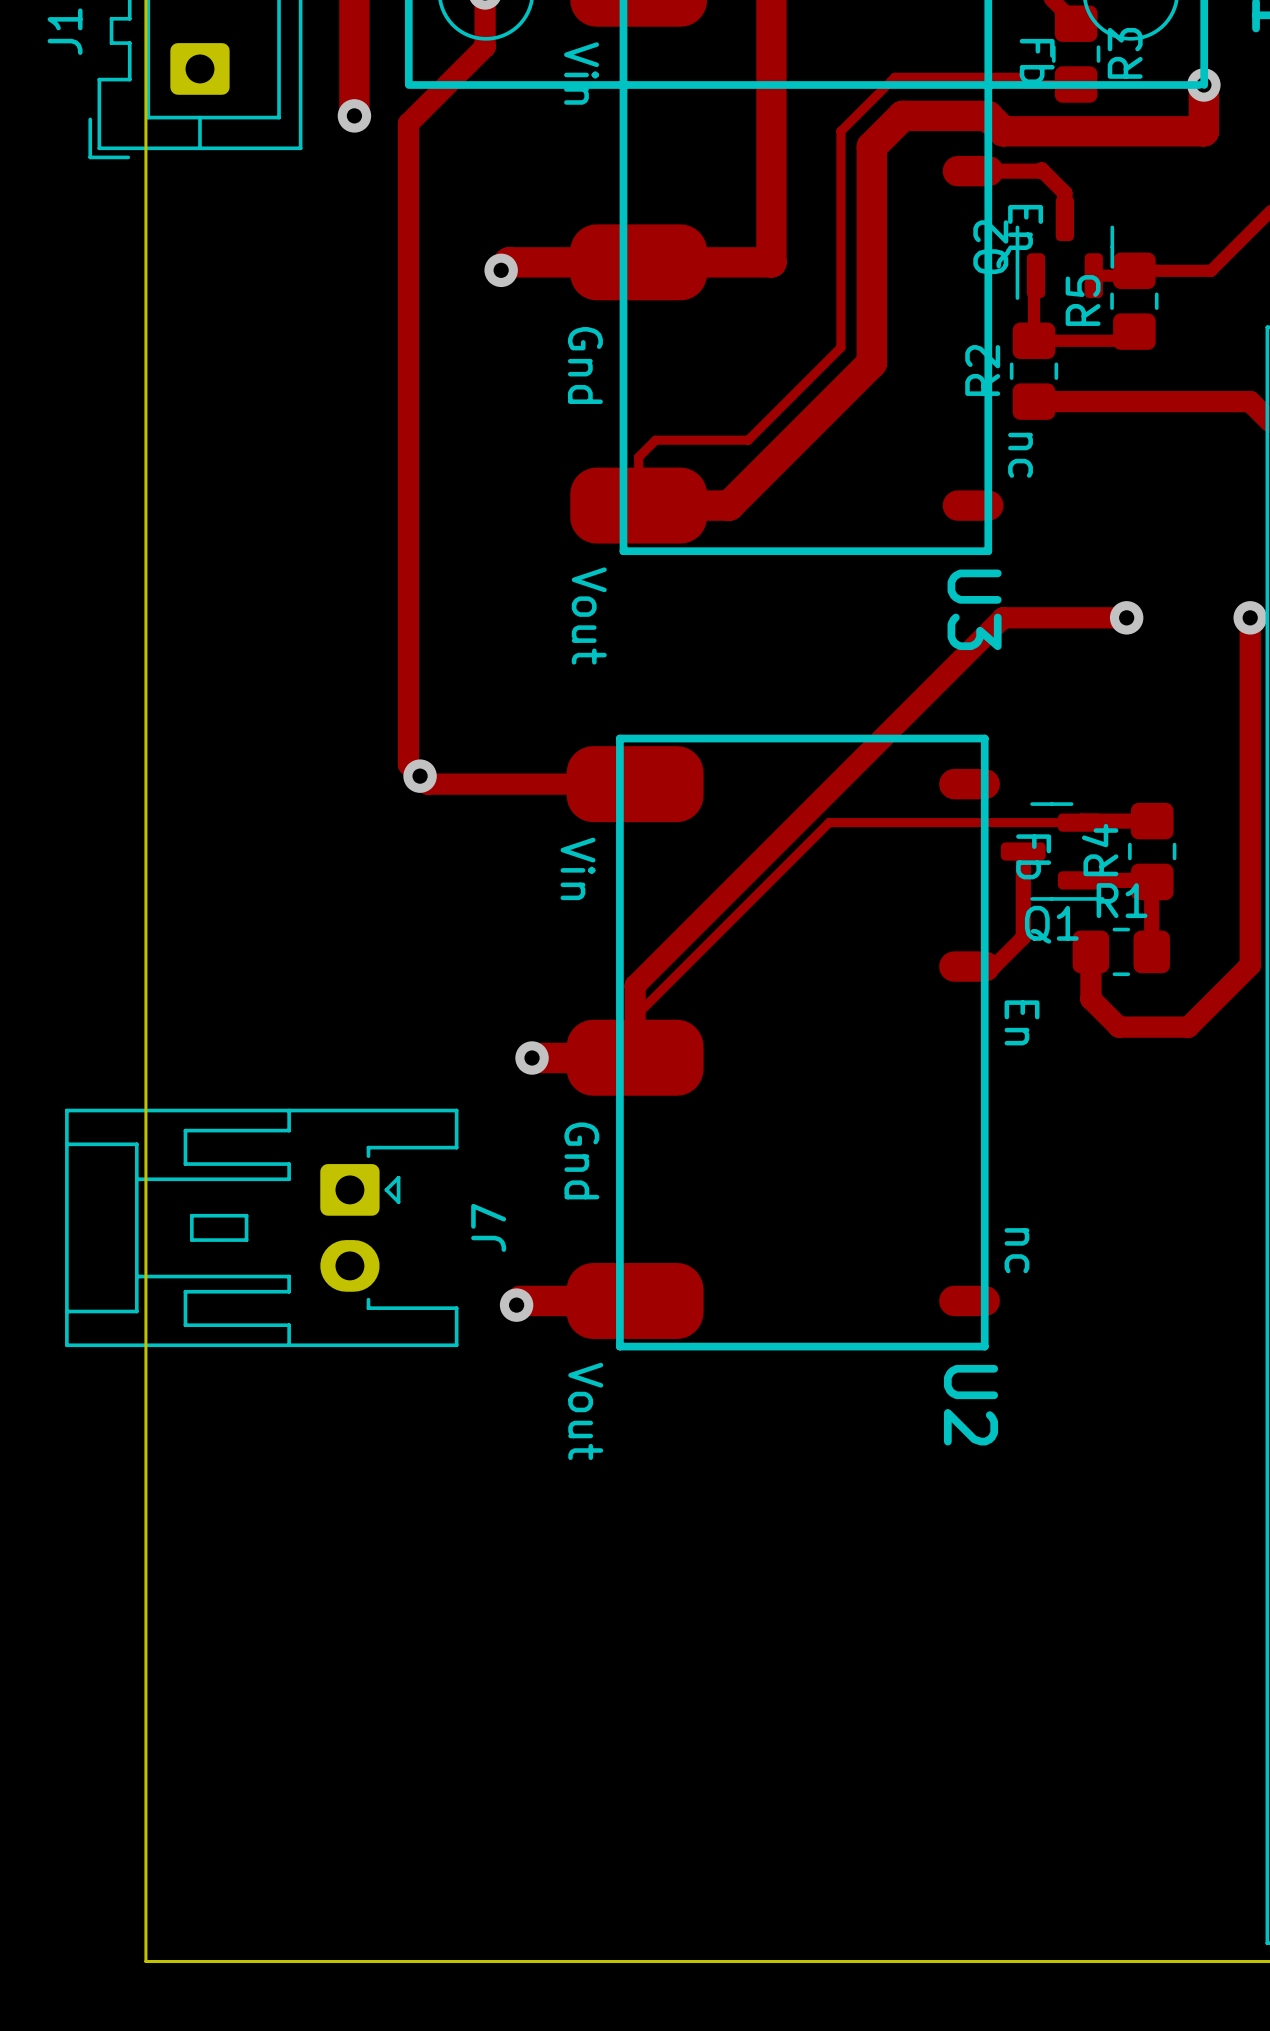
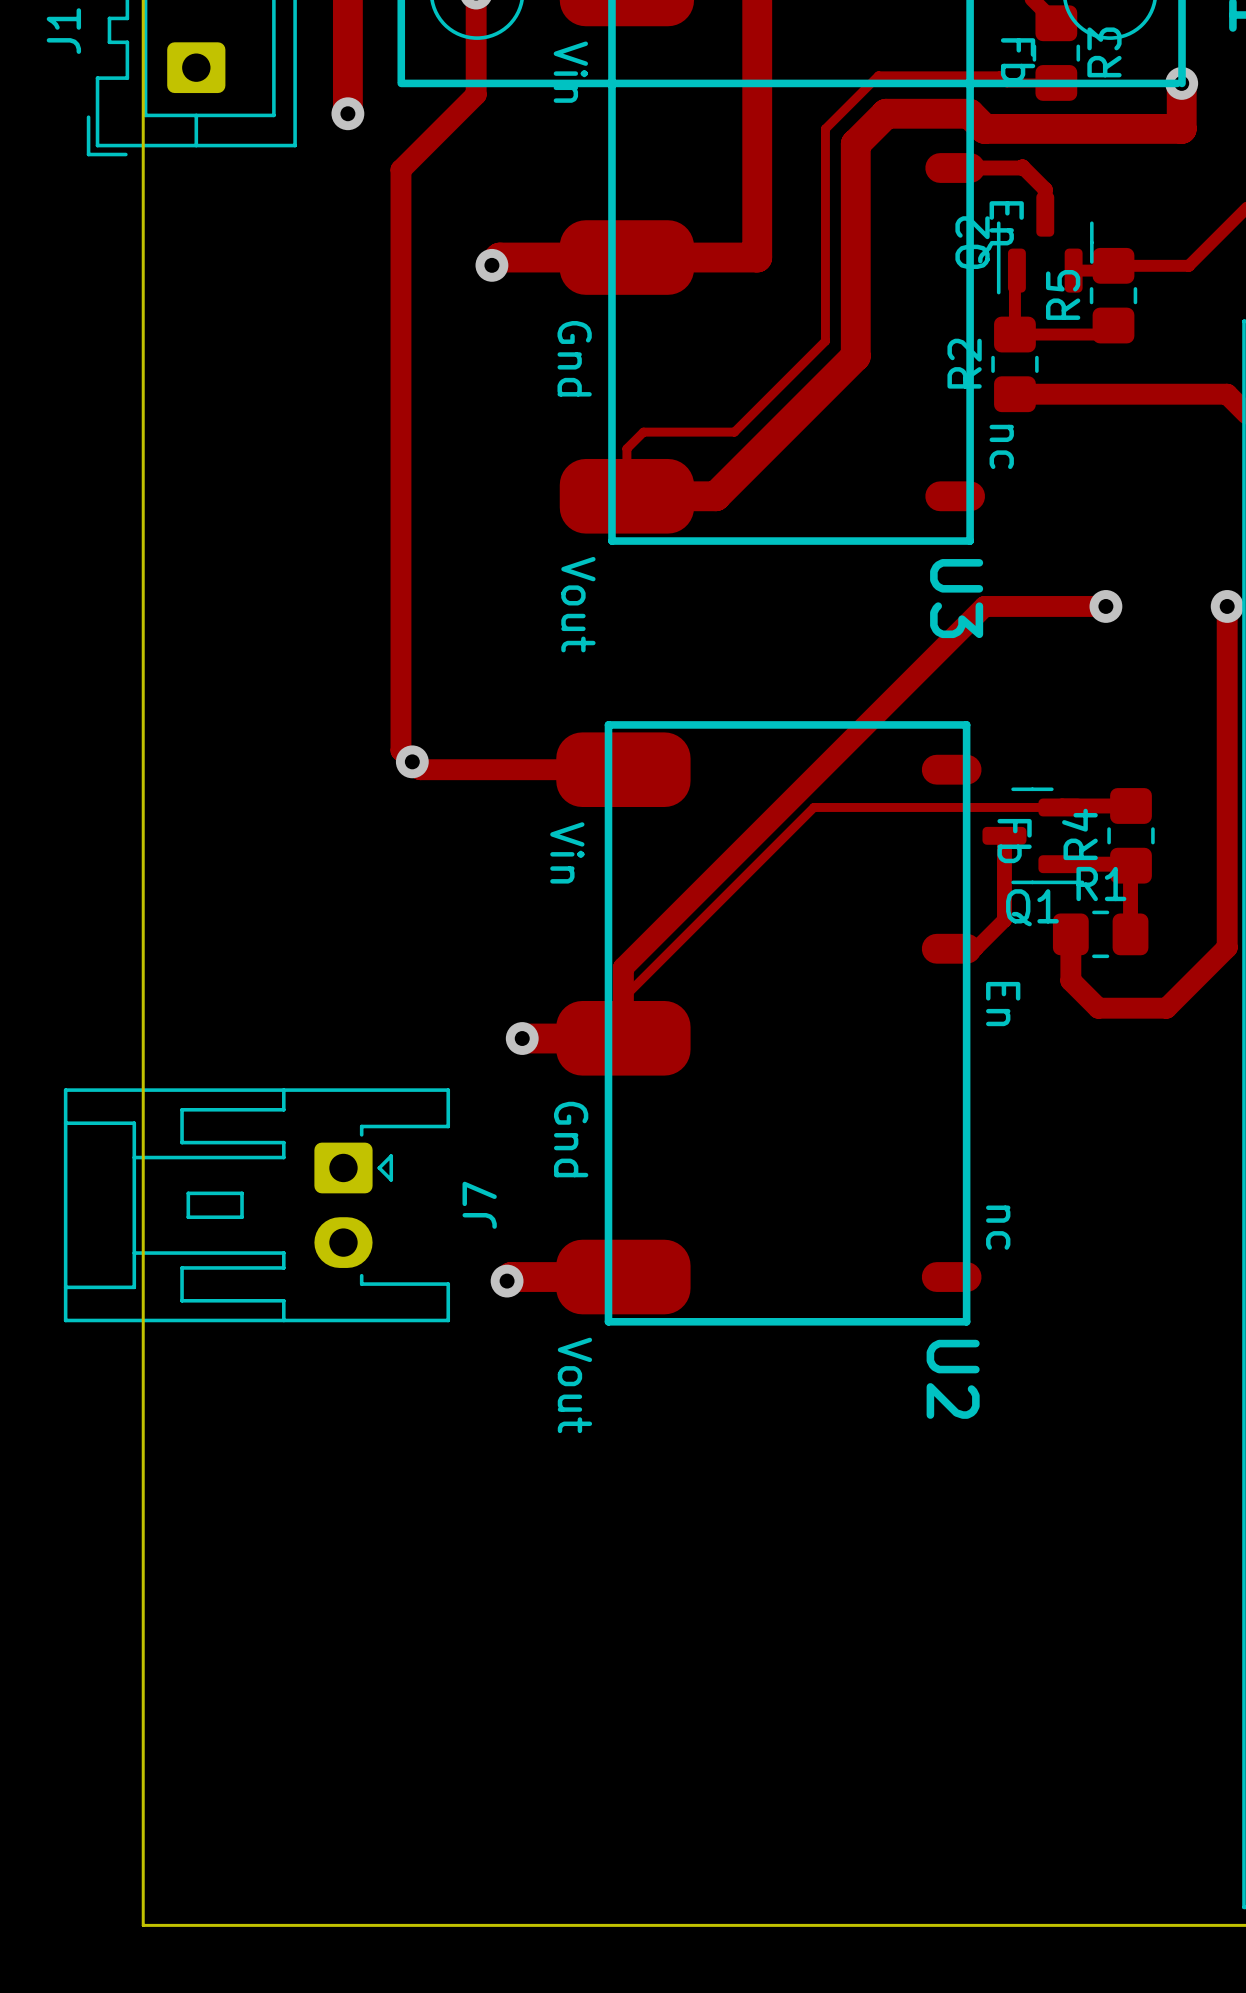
track: (485, 46) (408, 123) (408, 173) -> (476, 46) (476, 94) (400, 169)

